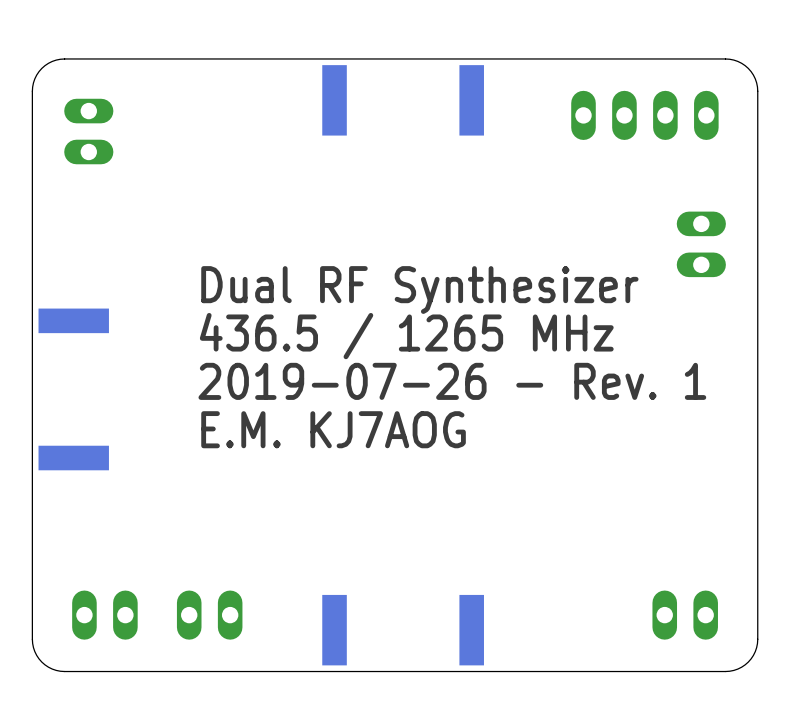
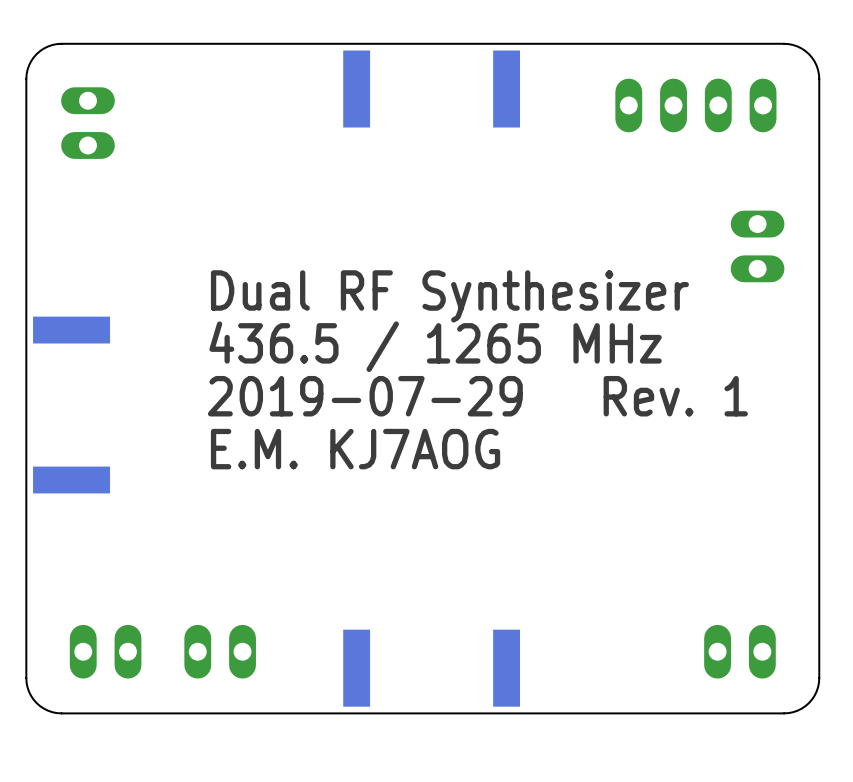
text: 2019-07-26 - Rev. 1 (452, 381) -> 2019-07-29 Rev. 1 (477, 396)

